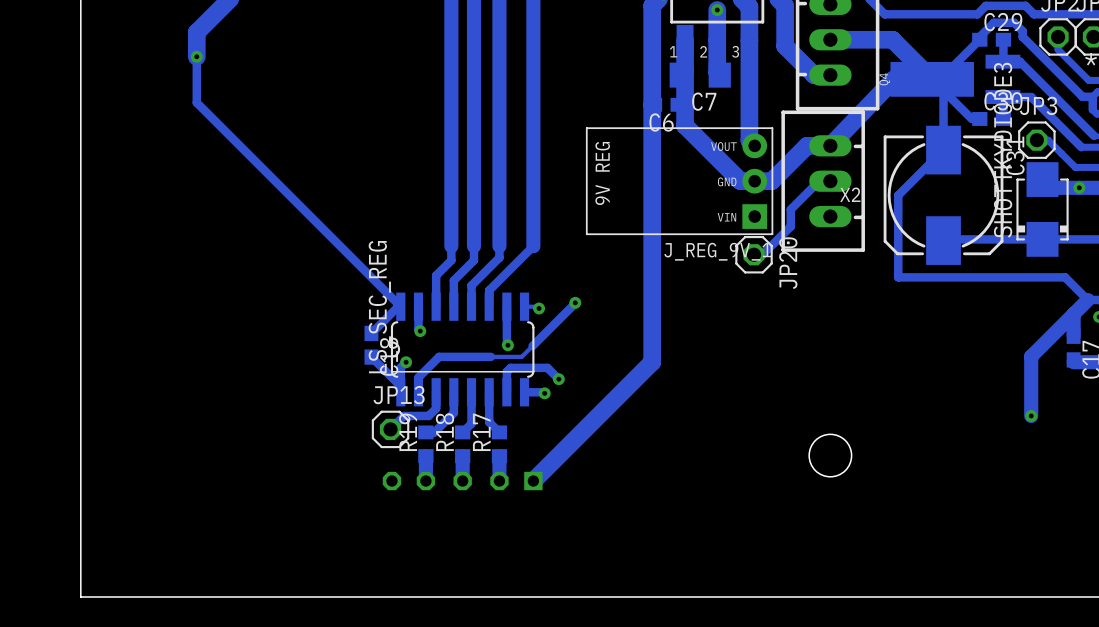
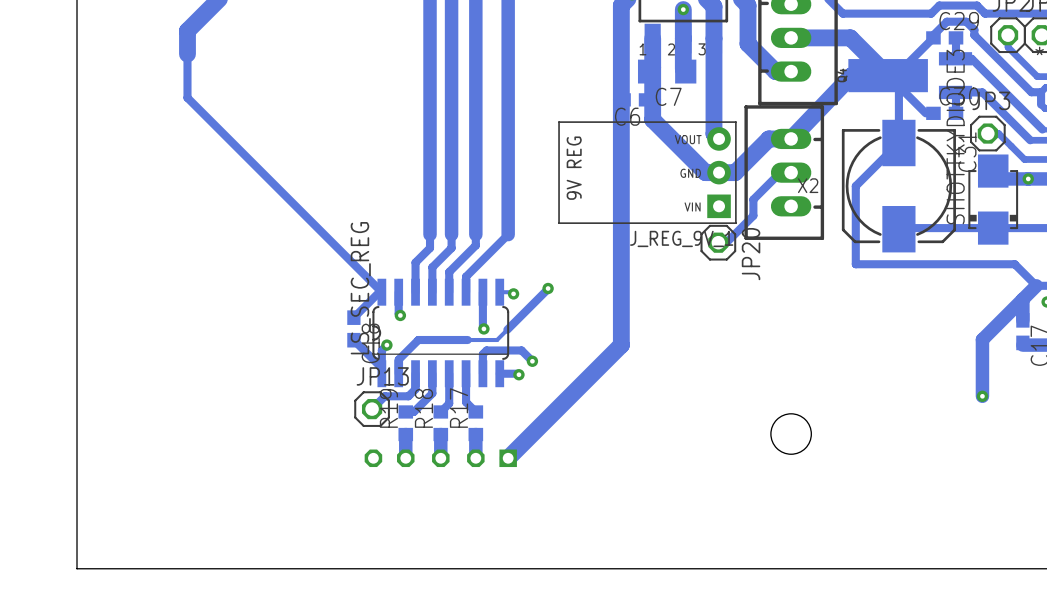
via: (196, 56) -> none

